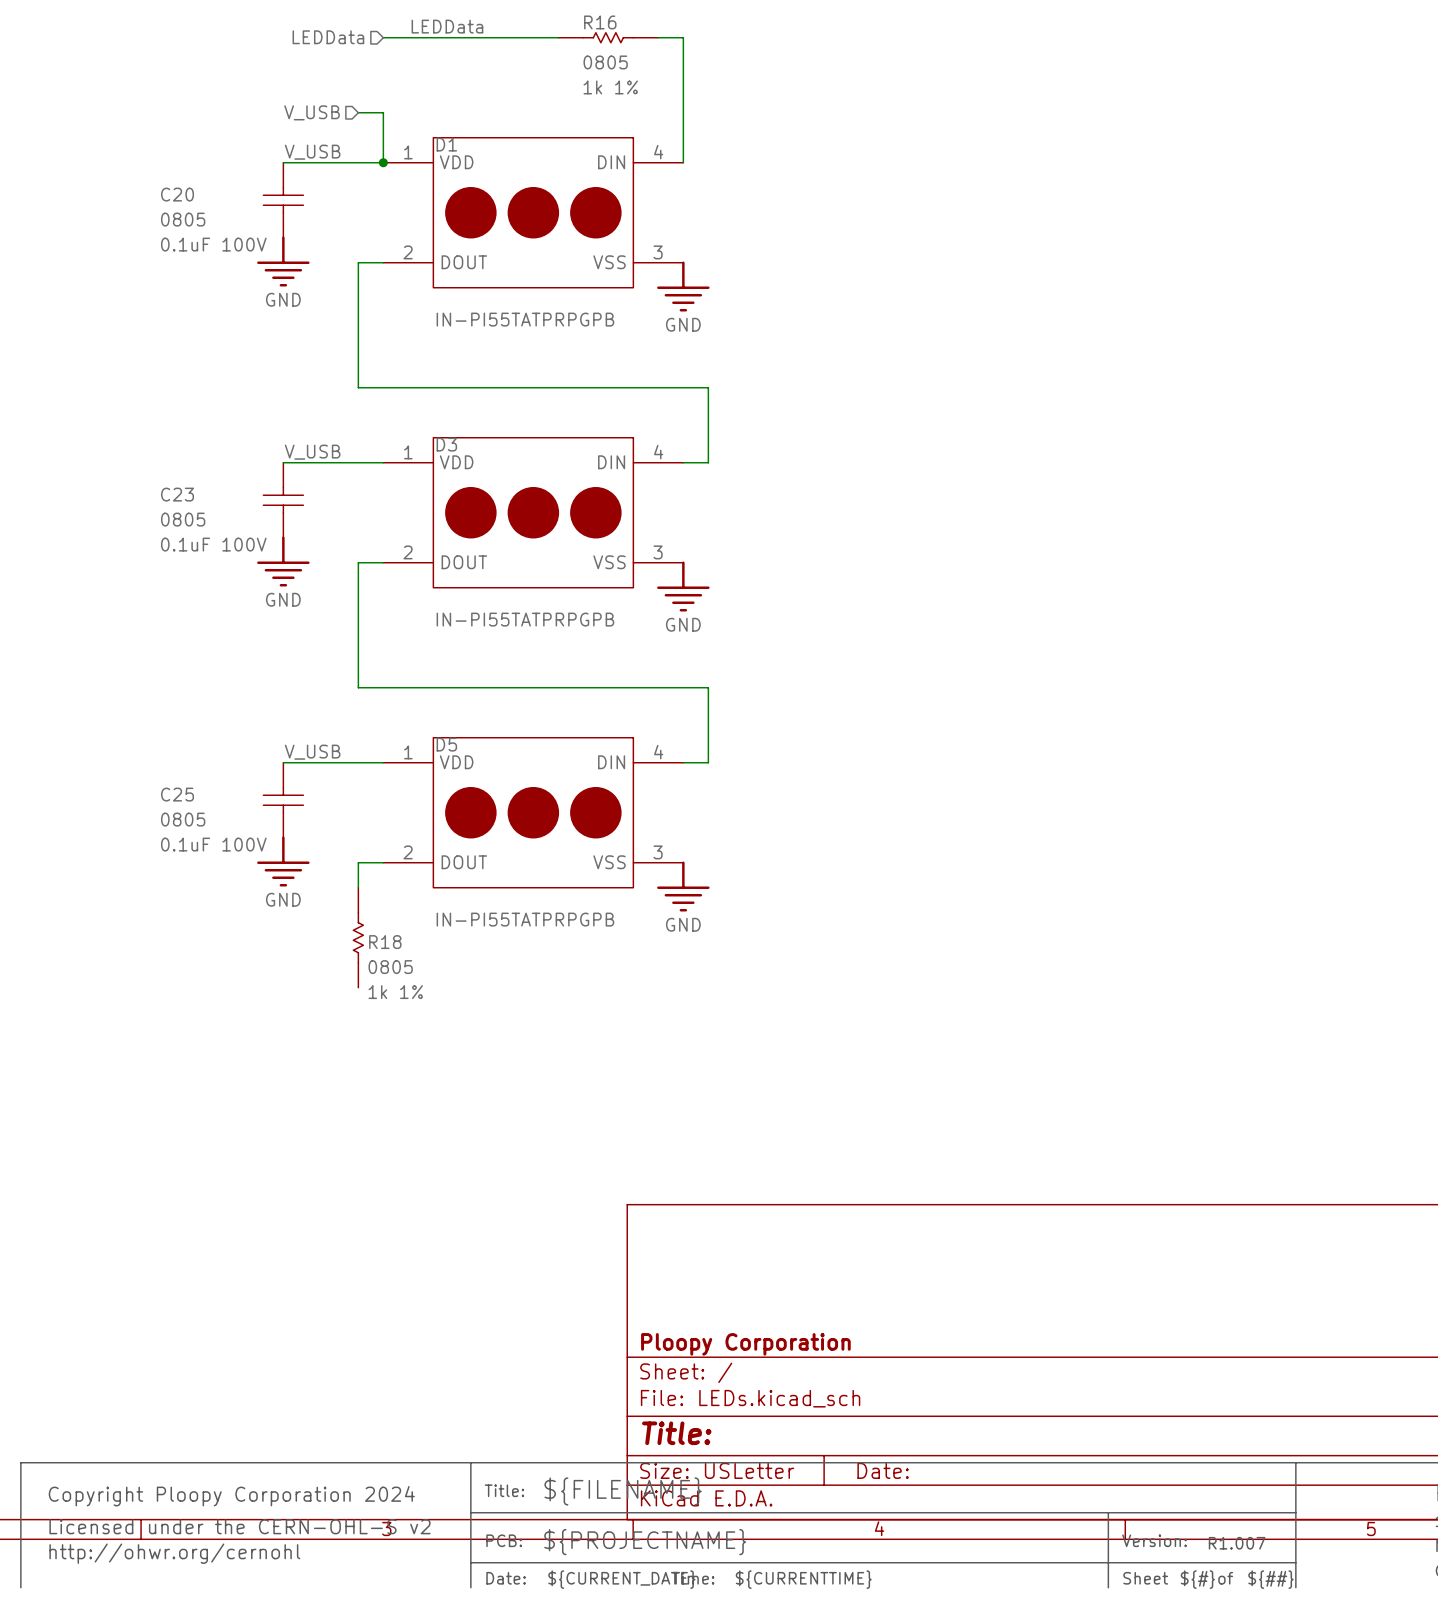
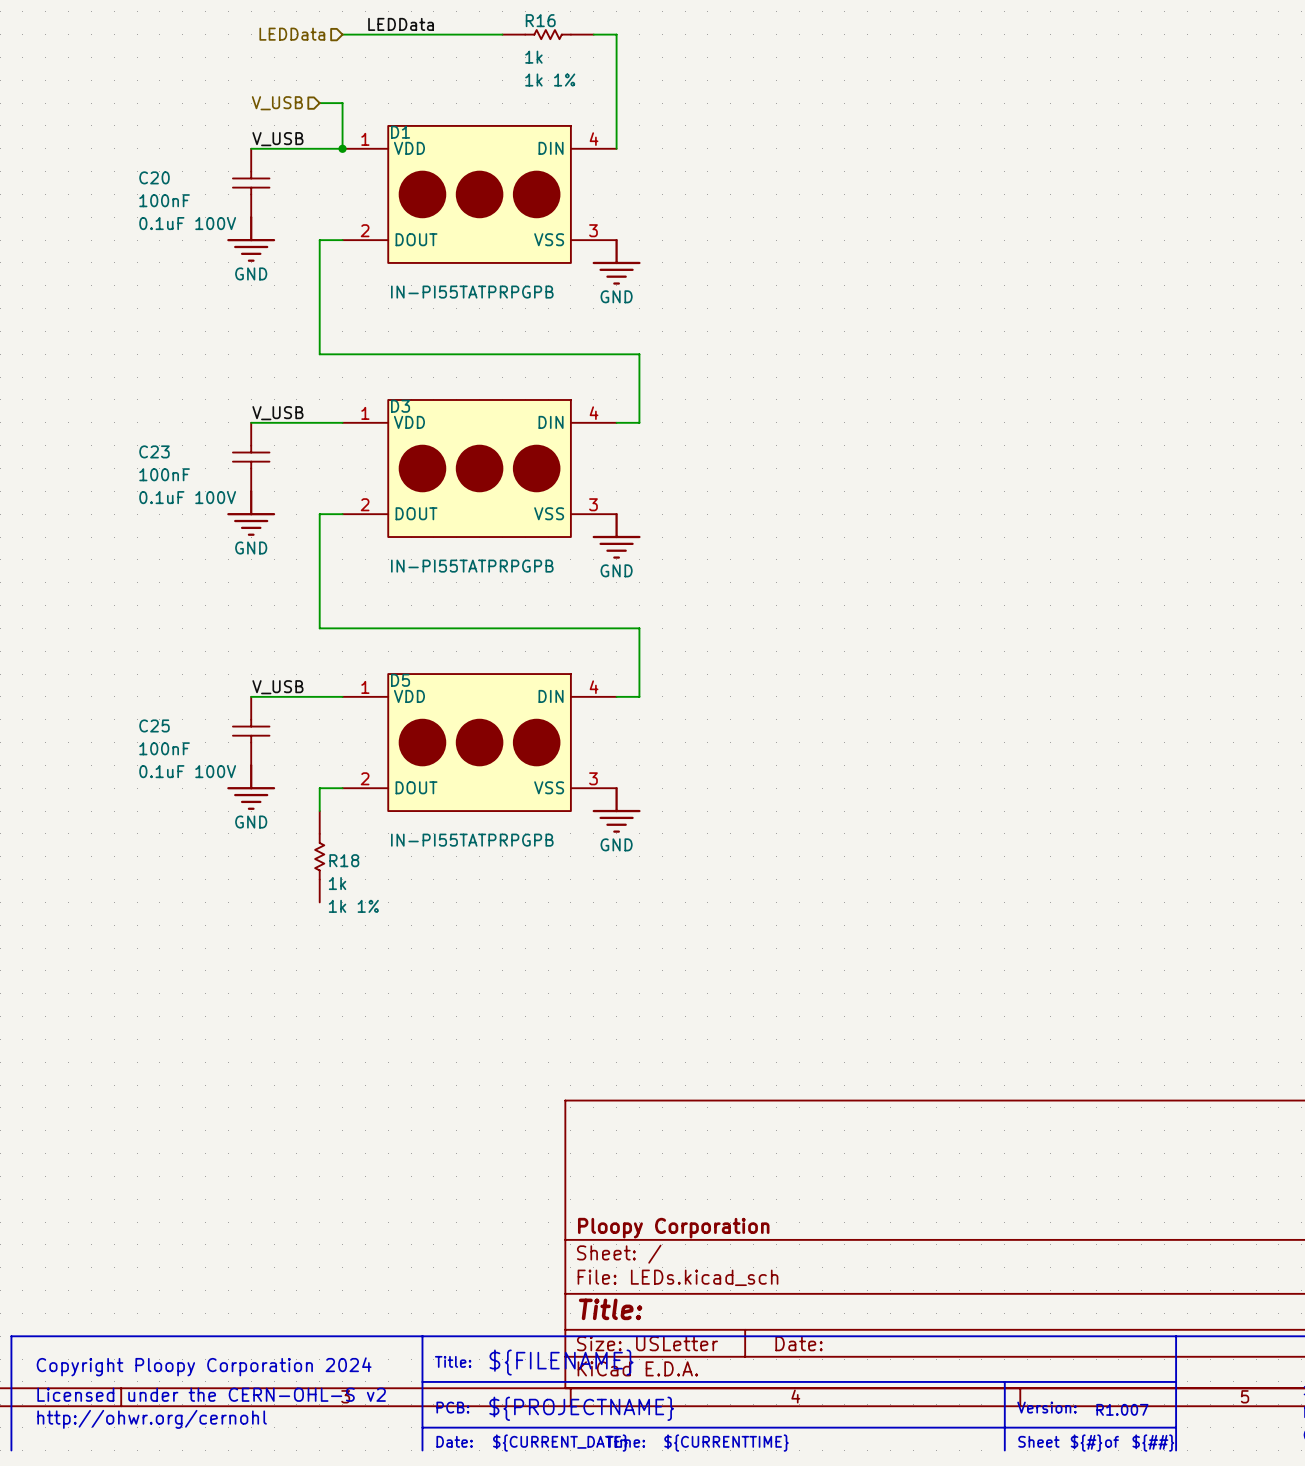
R16 value: 0805 (605, 62) -> 1k (533, 57)
C20 value: 0805 (183, 219) -> 100nF (164, 200)
C23 value: 0805 (183, 519) -> 100nF (164, 474)
C25 value: 0805 (183, 819) -> 100nF (164, 748)
R18 value: 0805 (390, 967) -> 1k (337, 883)

